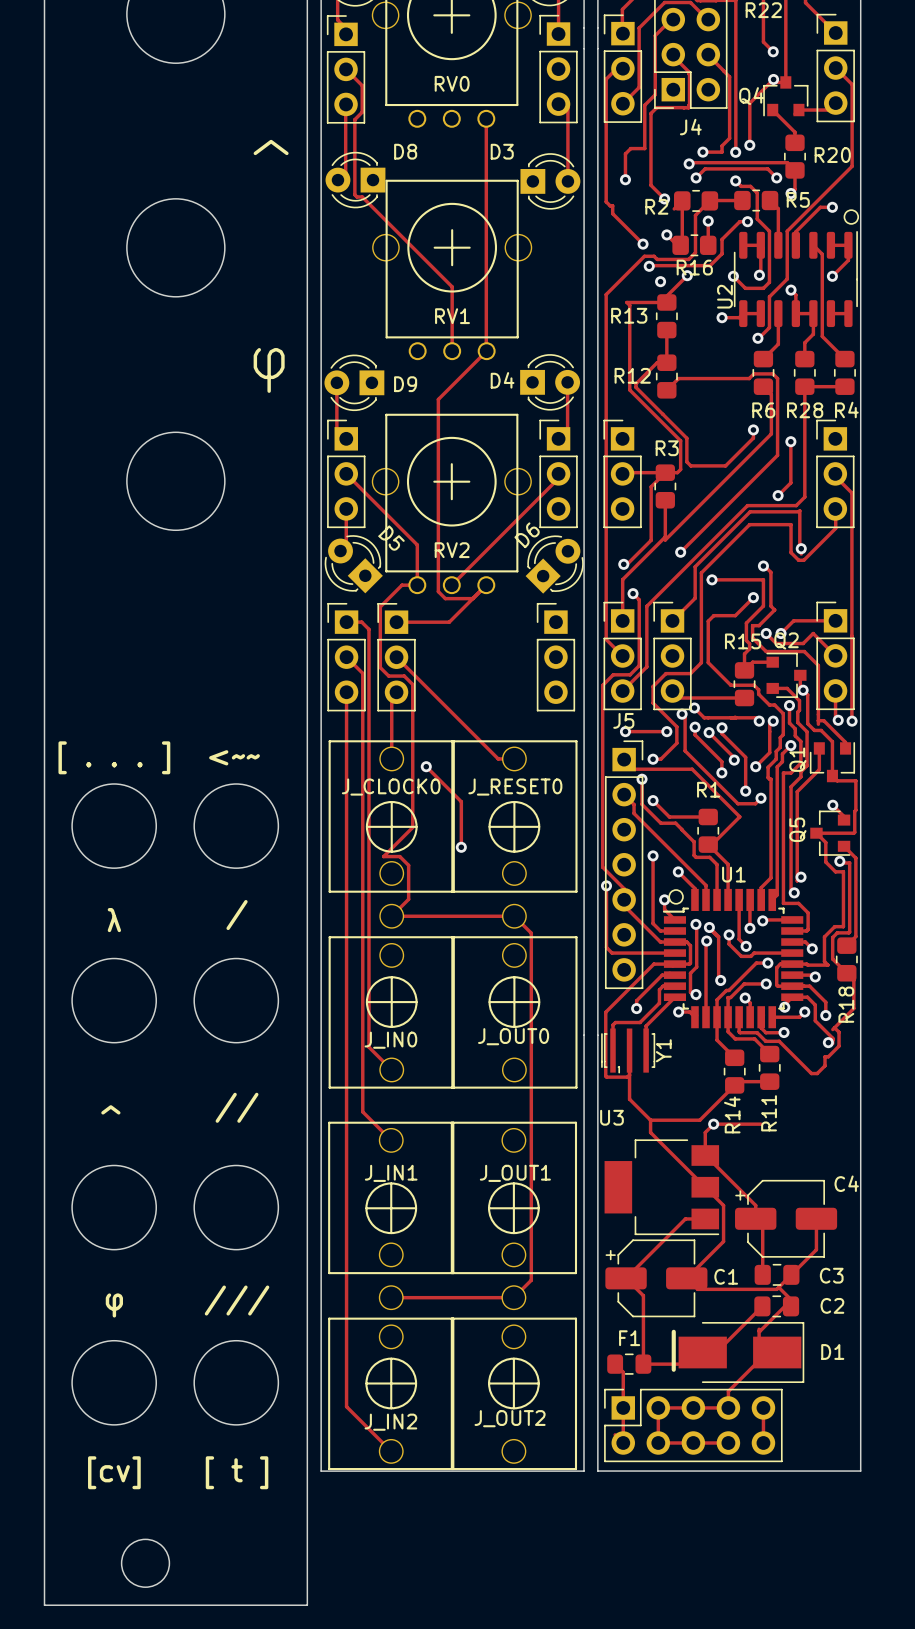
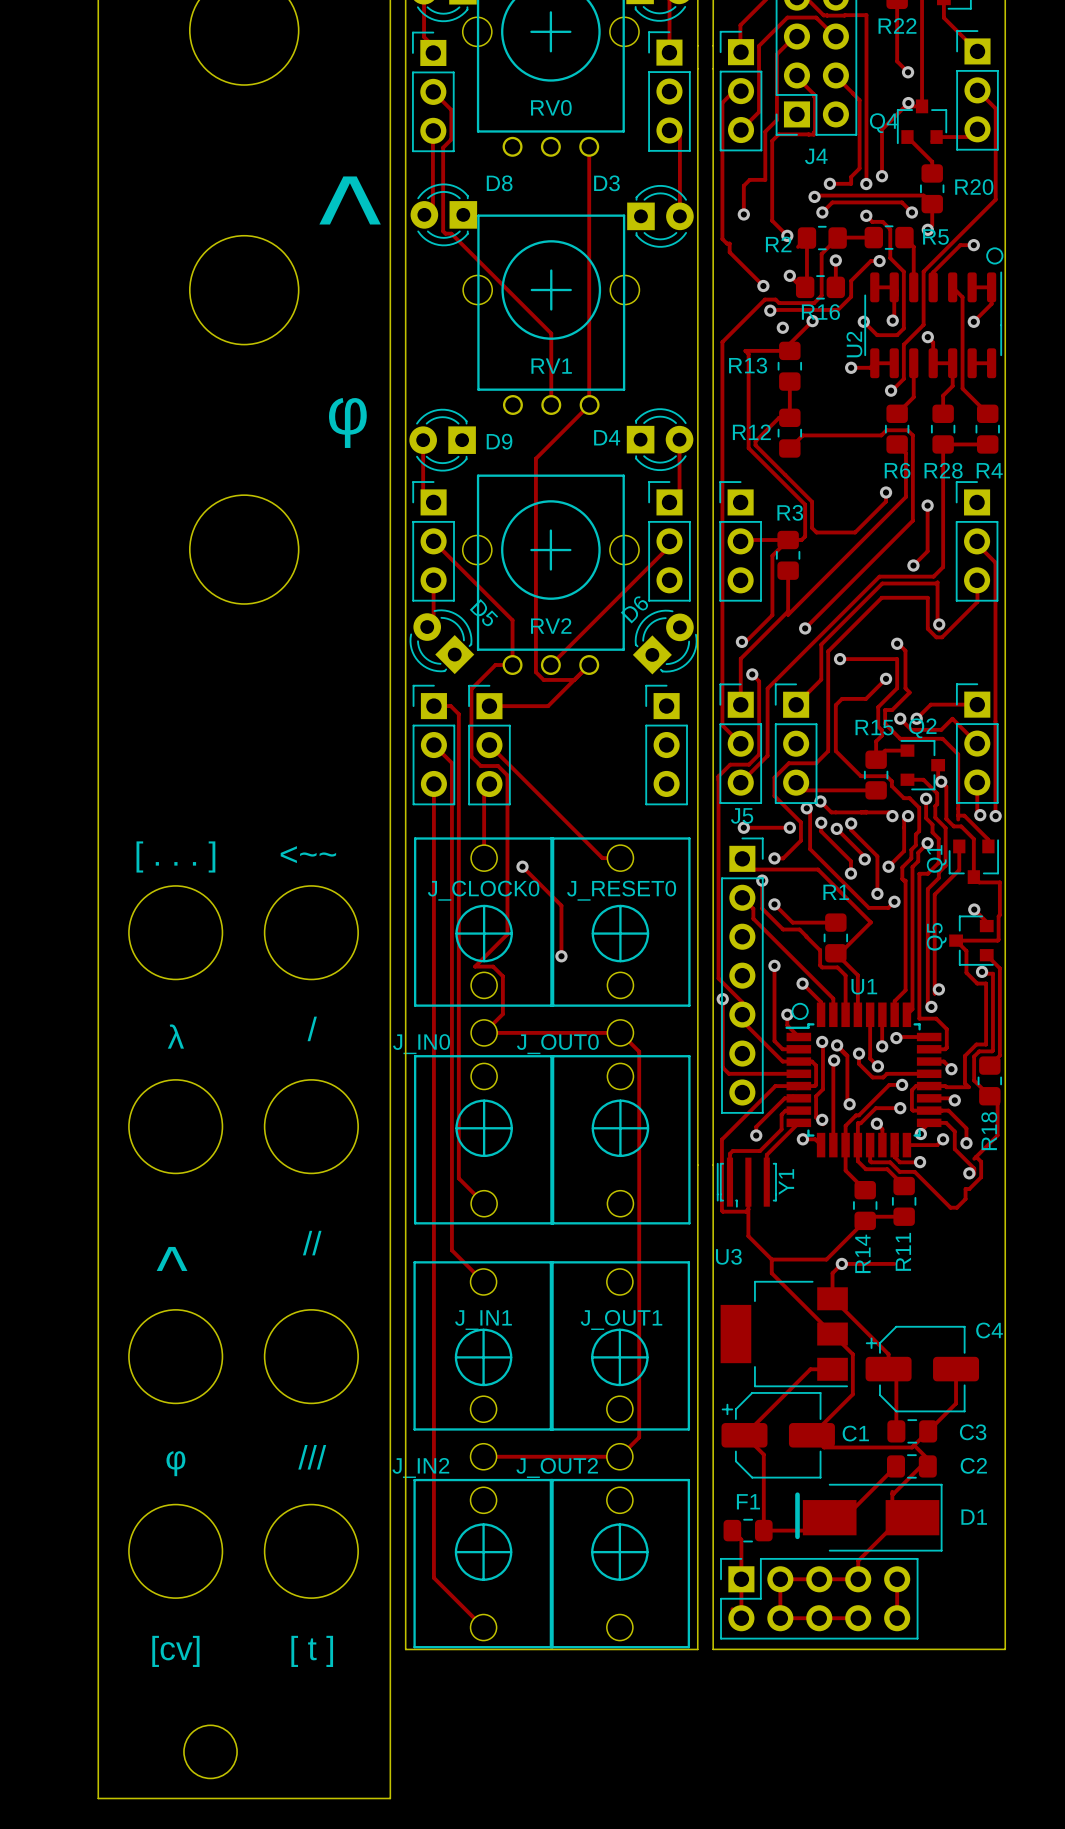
J_OUT0 name position: J_OUT0 (513, 1036) -> J_OUT0 (557, 1044)
J_IN0 name position: J_IN0 (390, 1040) -> J_IN0 (421, 1044)
J_OUT2 name position: J_OUT2 (510, 1418) -> J_OUT2 (557, 1467)
J_IN2 name position: J_IN2 (390, 1422) -> J_IN2 (420, 1467)

